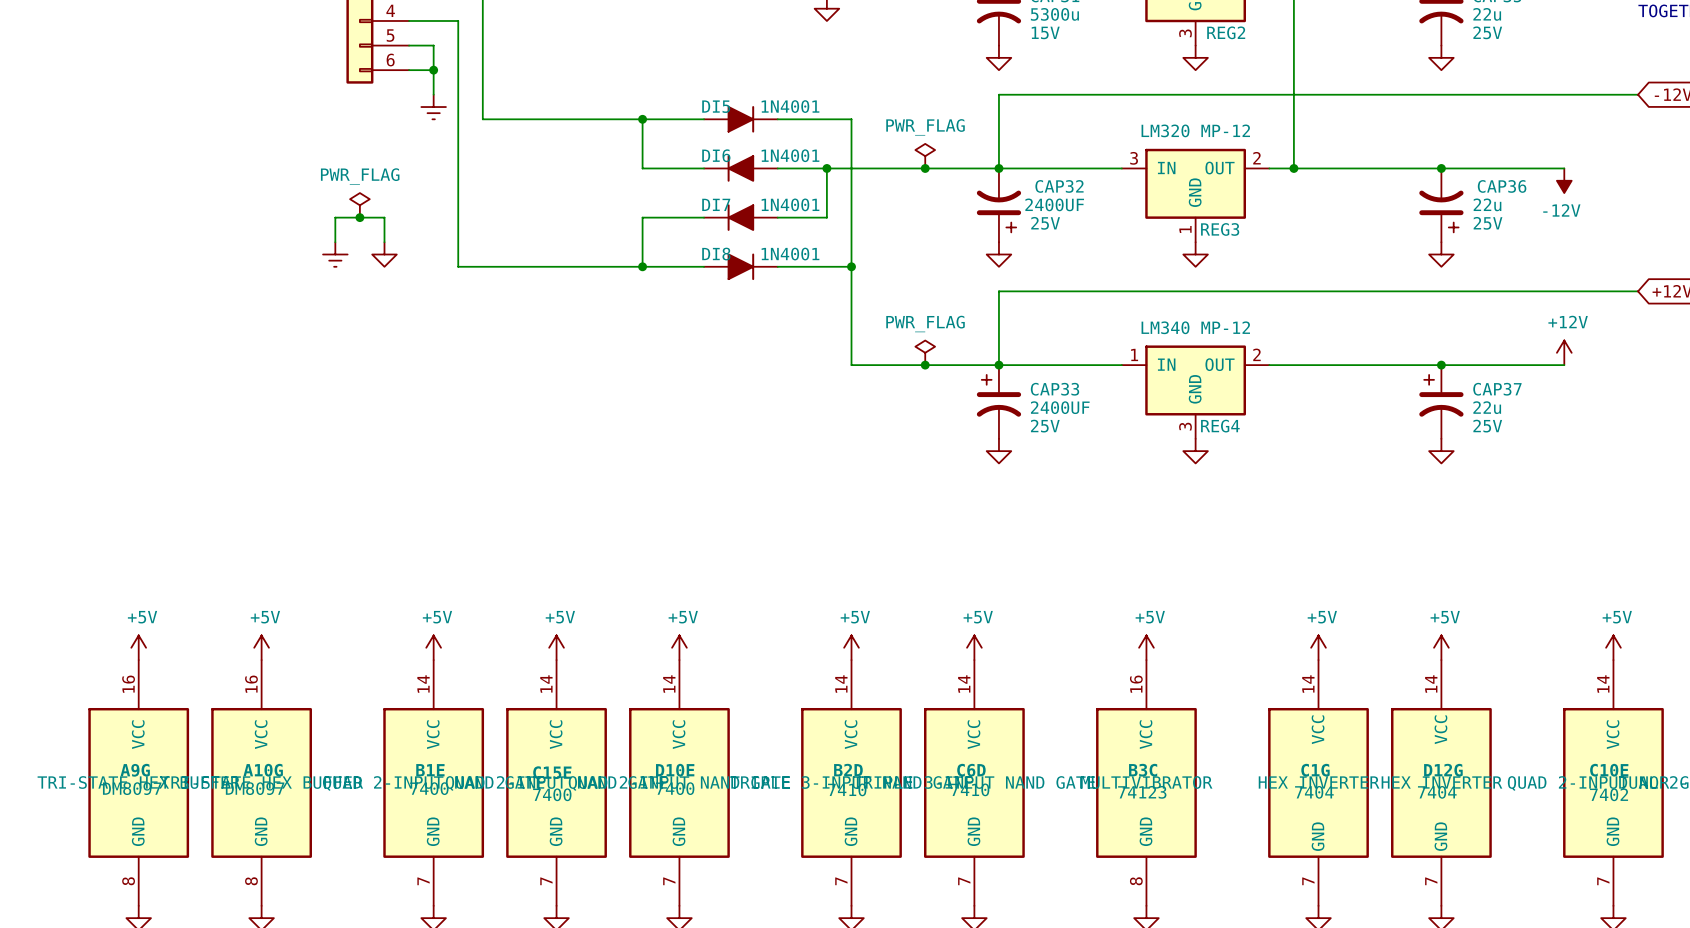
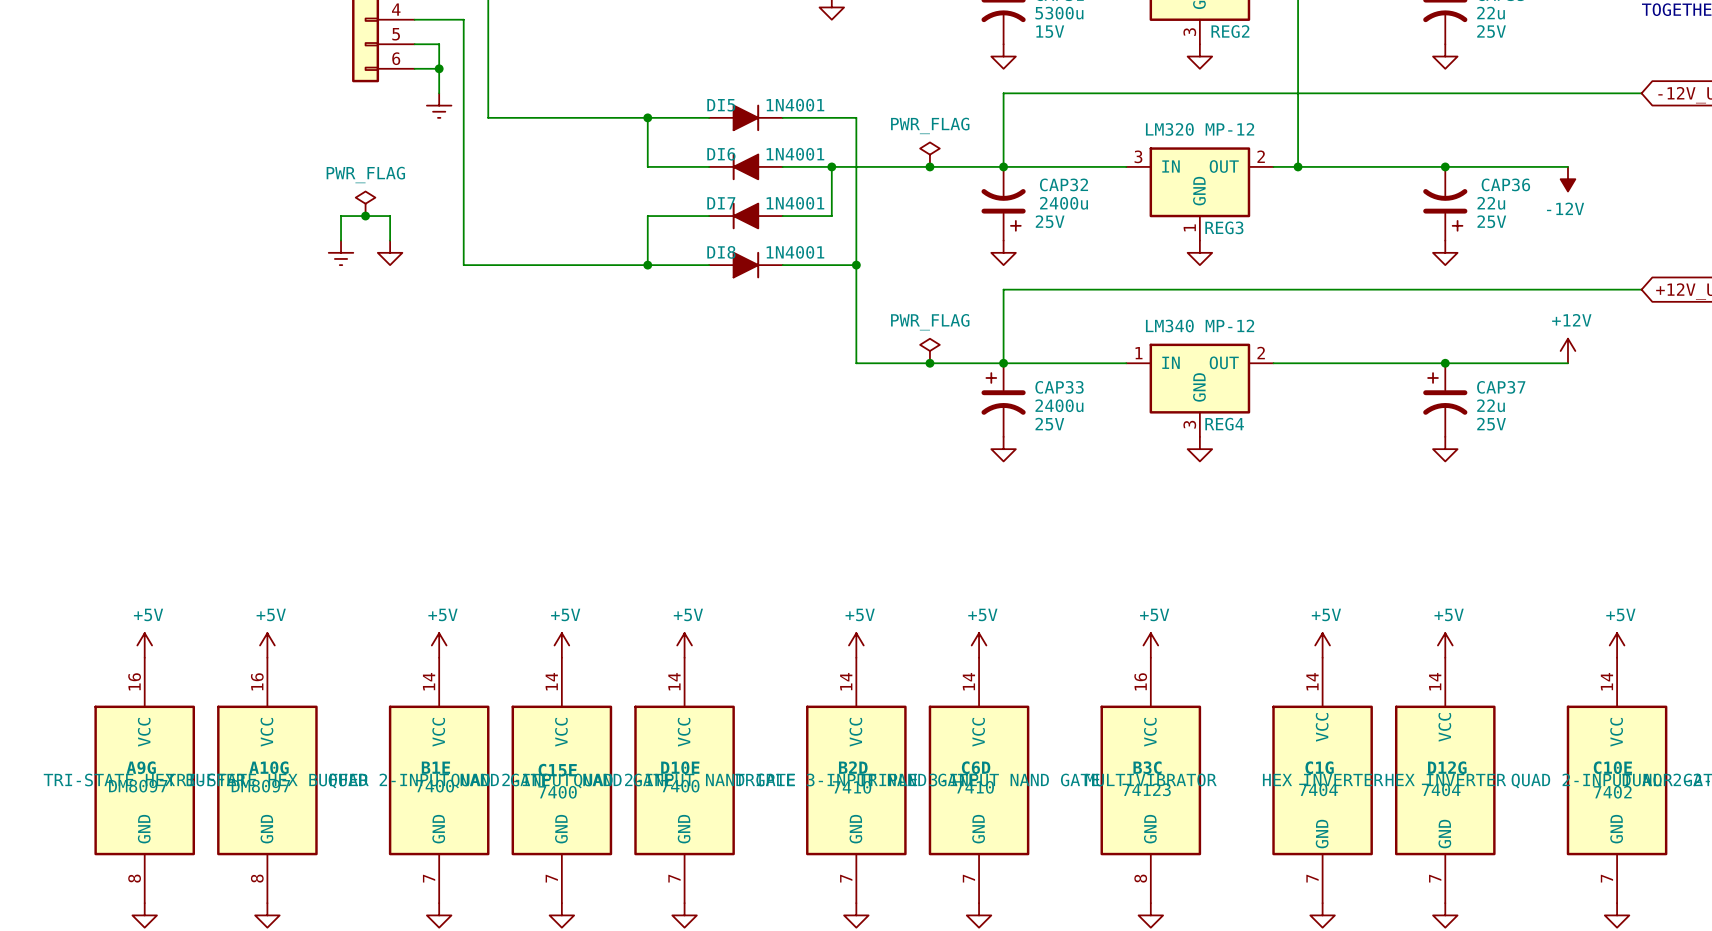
CAP32 value: 2400UF (1054, 204) -> 2400u (1064, 203)
CAP33 value: 2400UF (1060, 407) -> 2400u (1059, 405)

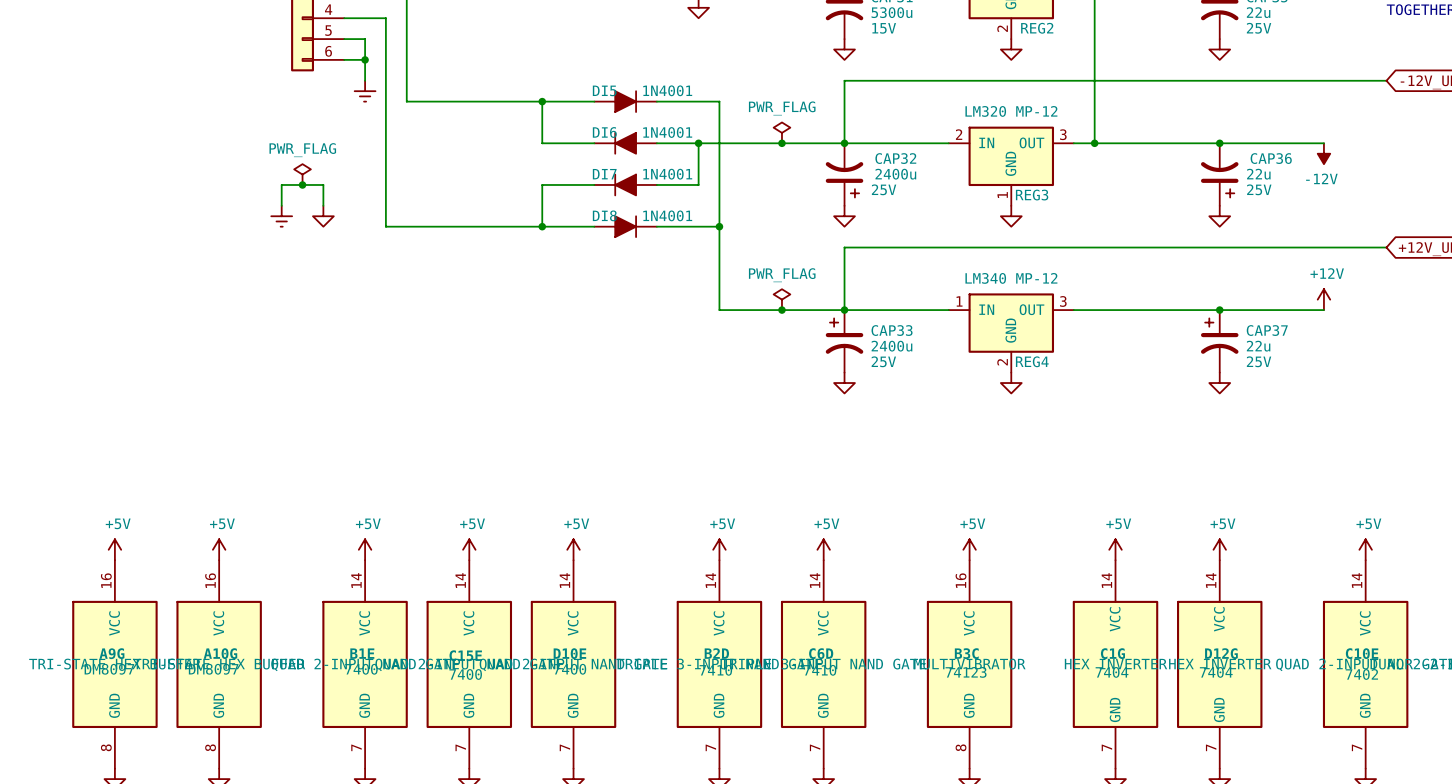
REG2 pin number: 3 (1189, 32) -> 2 (1002, 28)
REG3 pin number: 3 (1138, 156) -> 2 (959, 134)
REG3 pin number: 2 (1261, 156) -> 3 (1063, 134)
REG4 pin number: 2 (1261, 353) -> 3 (1063, 301)
REG4 pin number: 3 (1189, 424) -> 2 (1002, 362)

